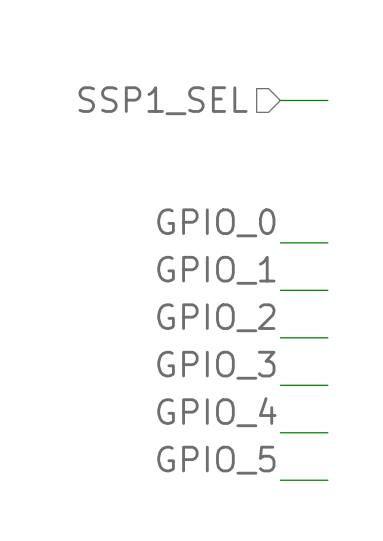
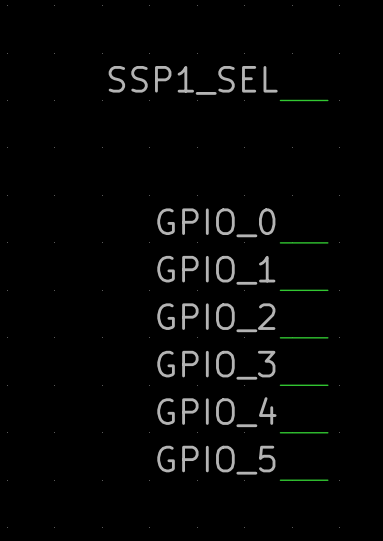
label: none -> SSP1_SEL (193, 80)
hierarchical label: SSP1_SEL (163, 100) -> none

